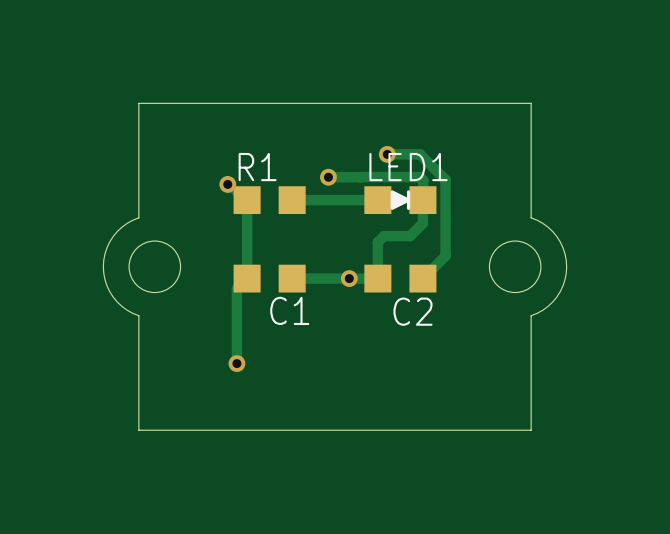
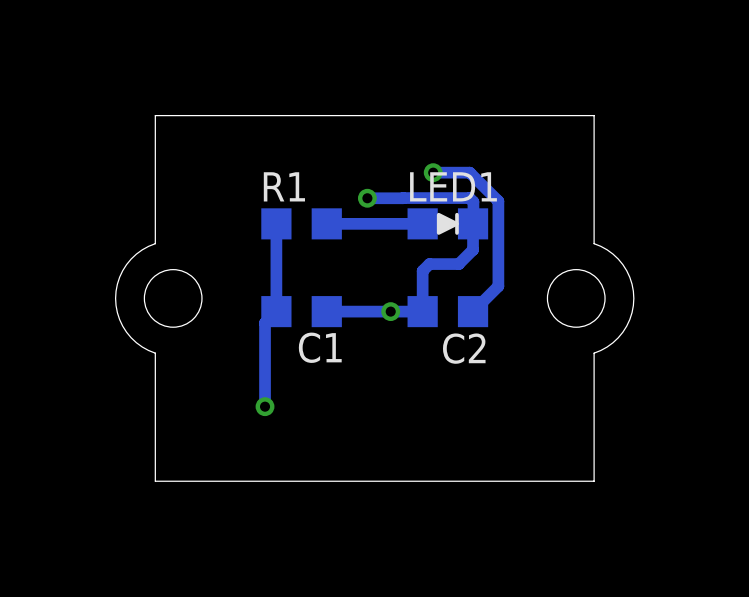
via: (227, 184) -> none

